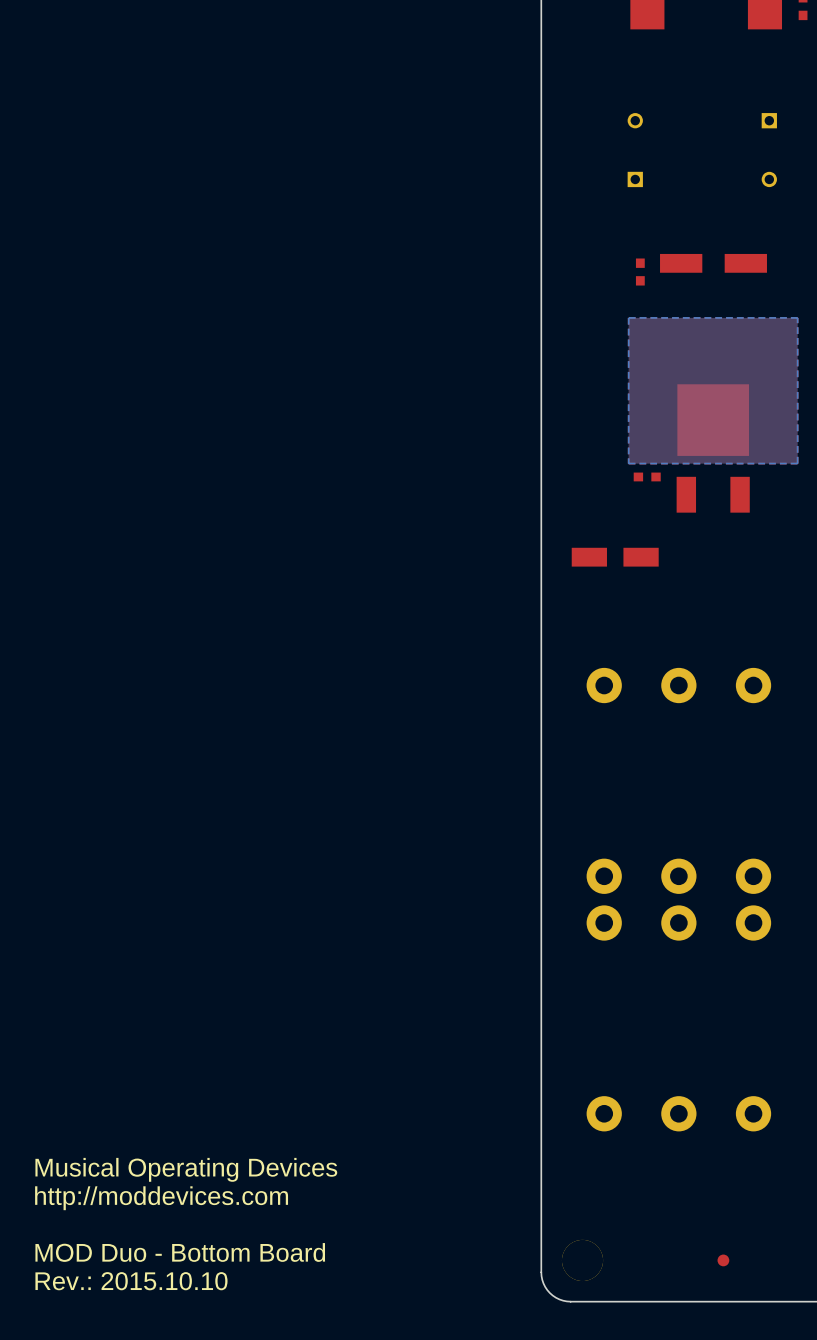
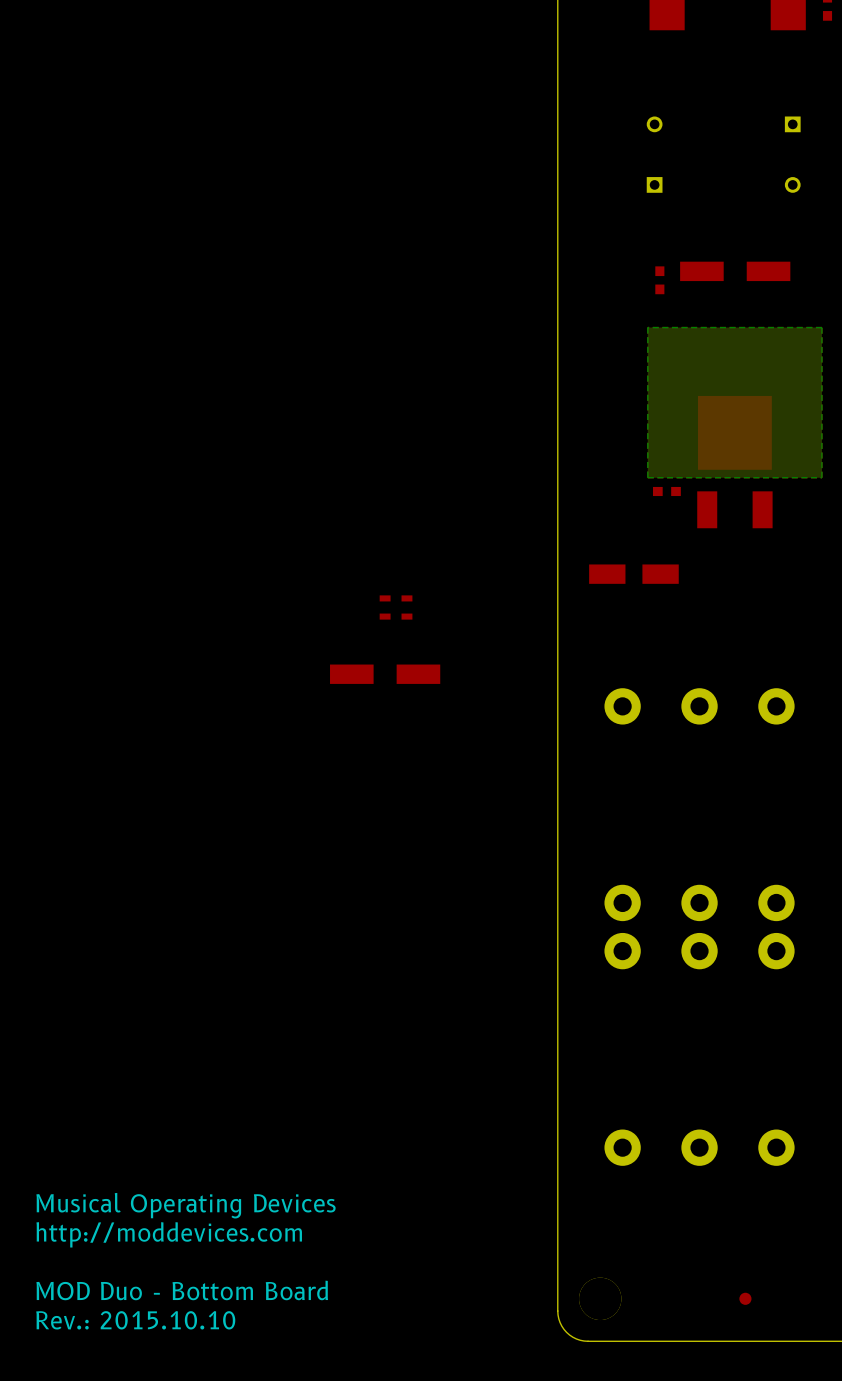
part: none -> (385, 607)
part: none -> (406, 607)
part: none -> (385, 674)

